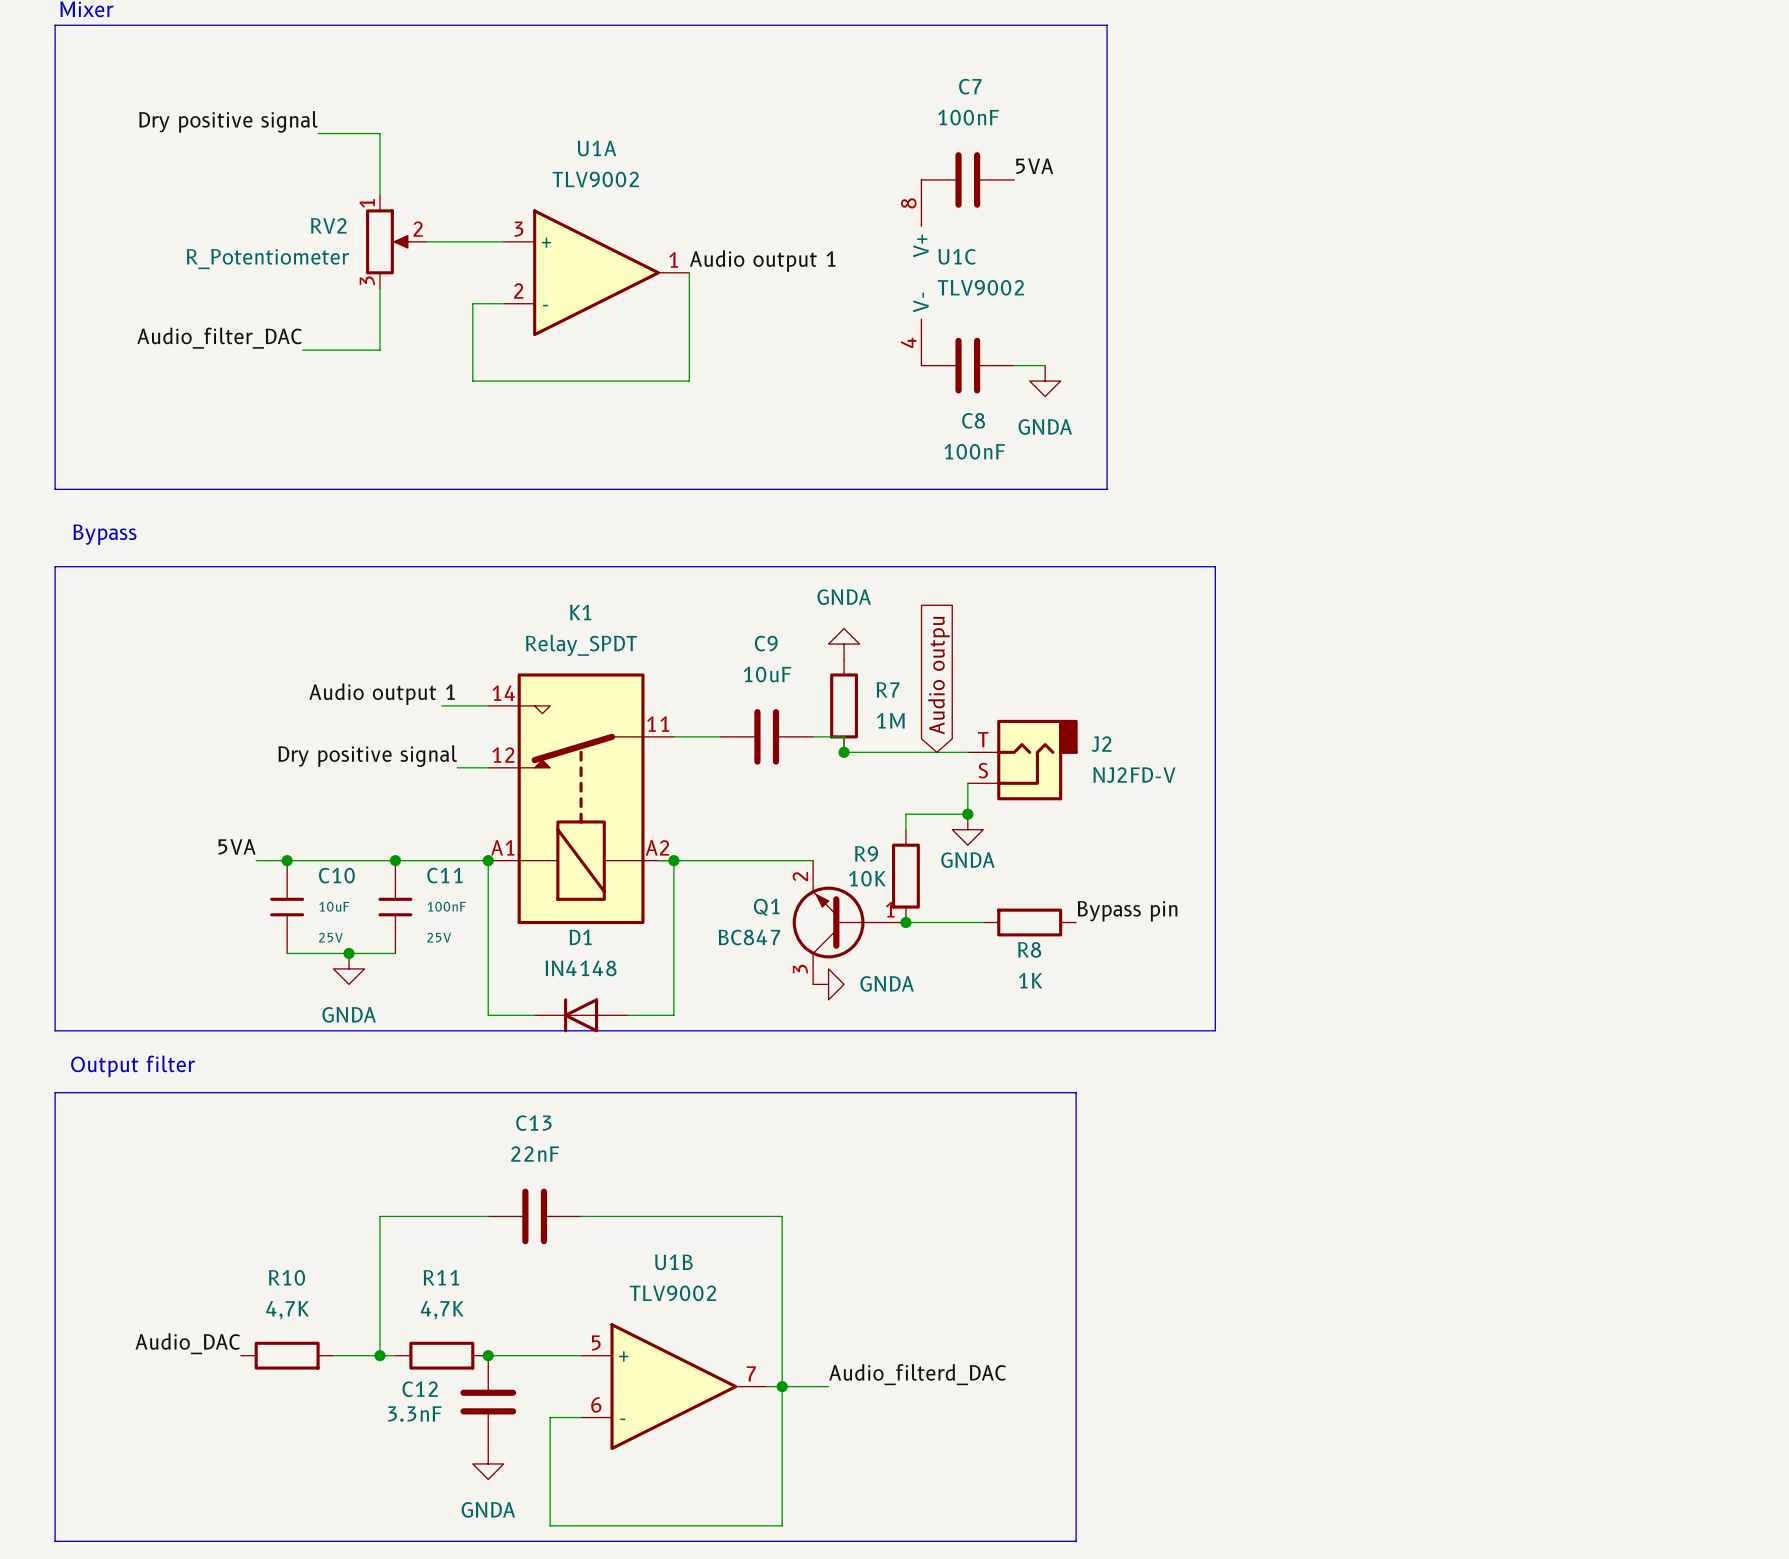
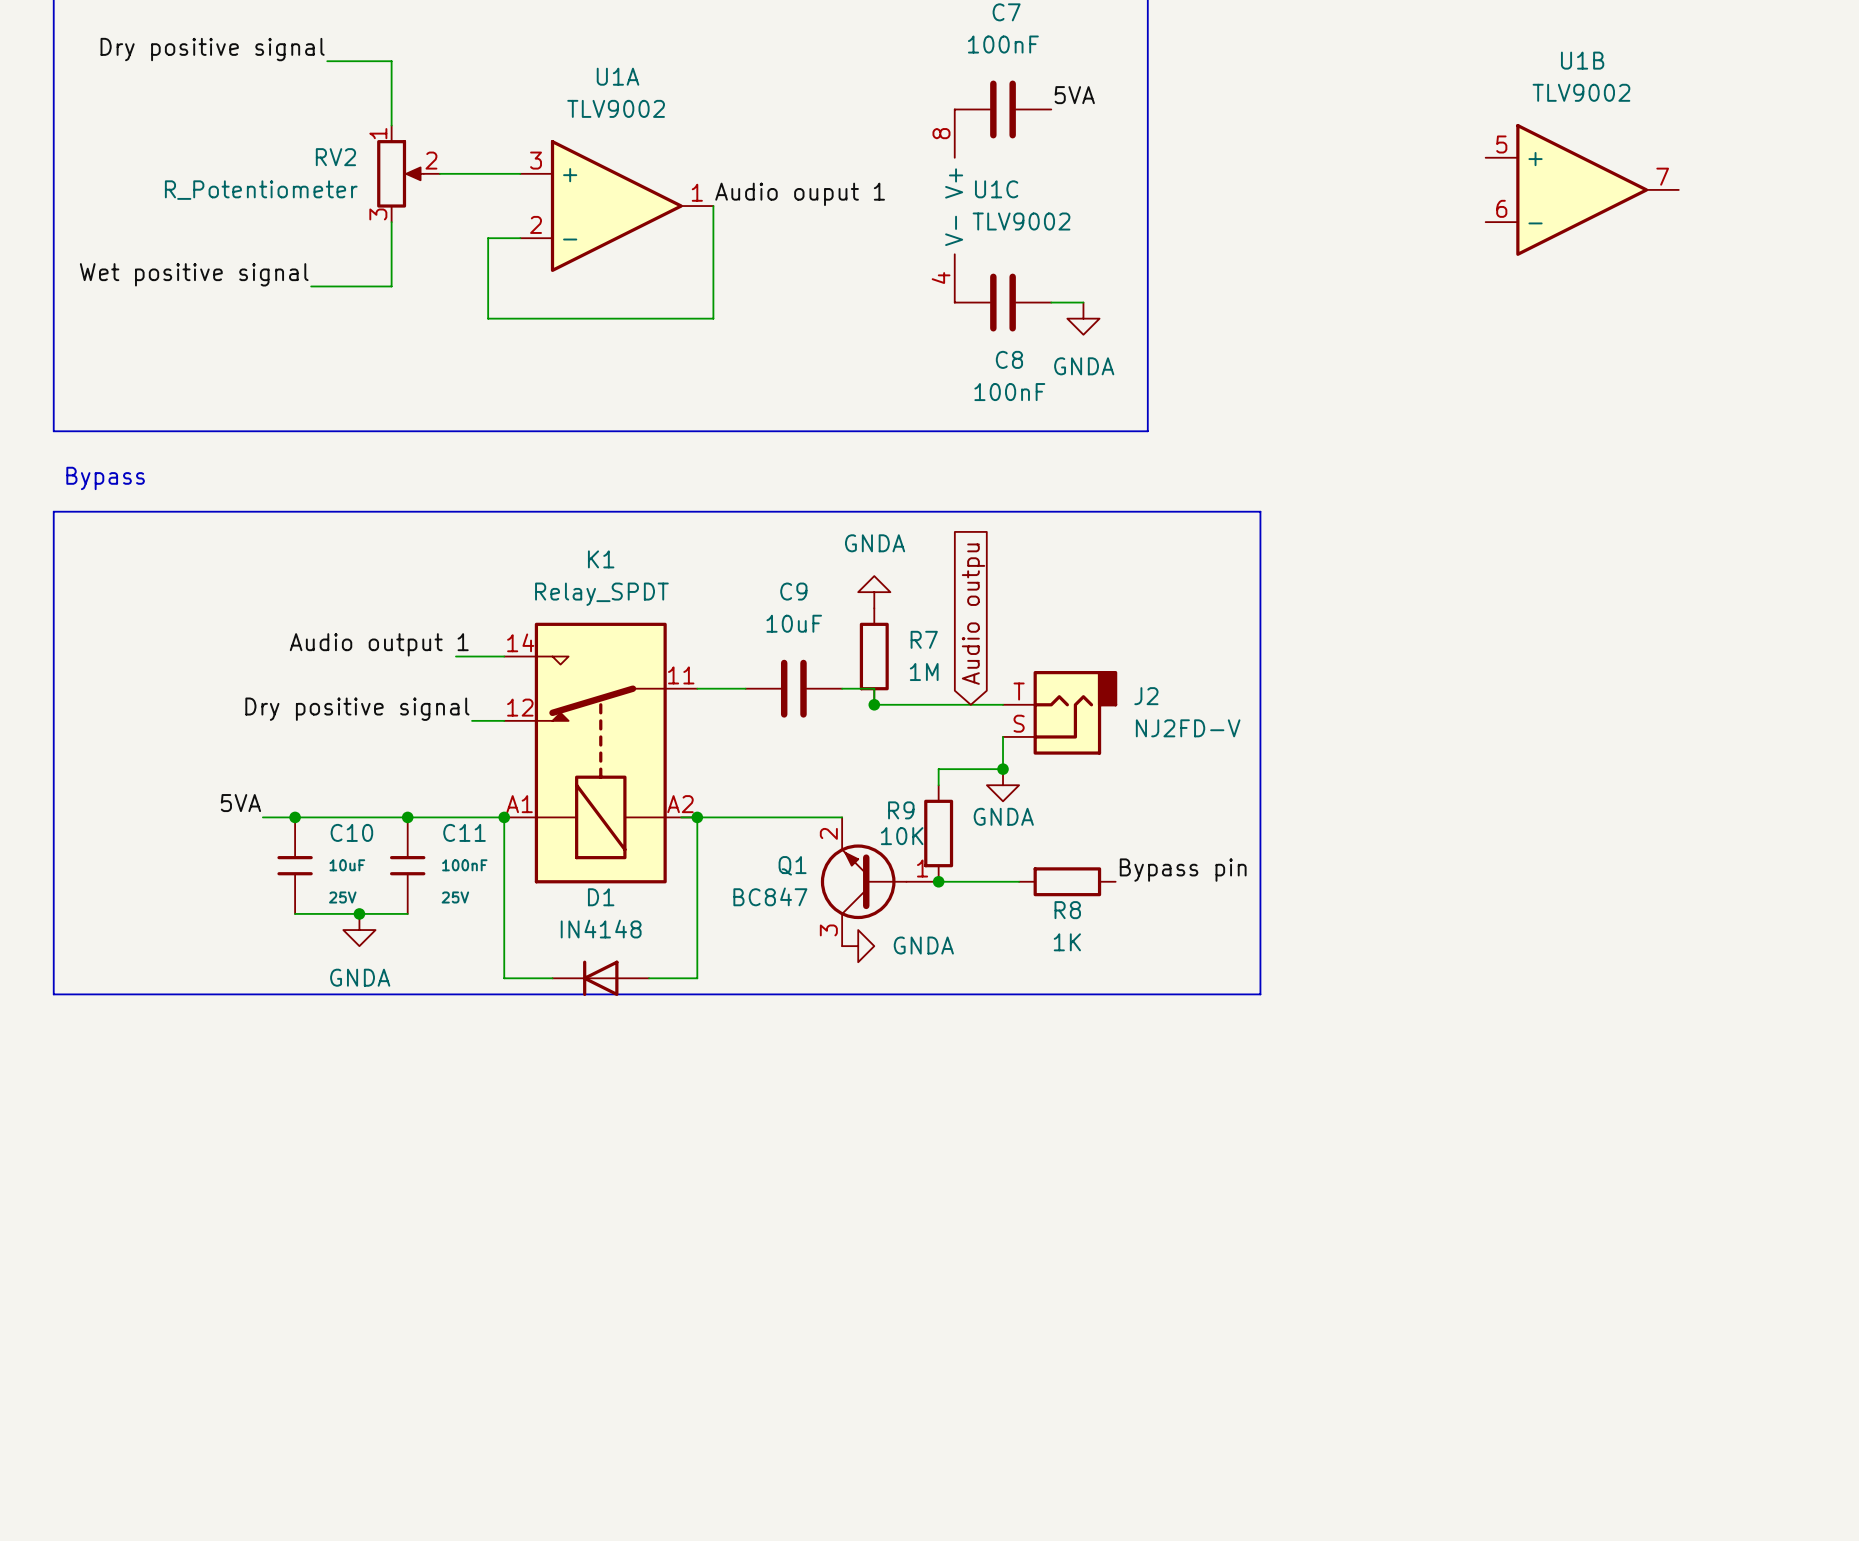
label: Audio output 1 (762, 261) -> Audio ouput 1 (800, 194)
label: Audio_filter_DAC (219, 338) -> Wet positive signal (194, 274)
text: Output filter (133, 1066) -> none
line: (55, 1092) (1076, 1092) (1076, 1541) (55, 1541) (55, 1092) -> none
wire: (488, 1216) (379, 1216) (379, 1355) -> none
C13: 22nF (534, 1216) -> none
wire: (581, 1216) (782, 1216) (782, 1525) (550, 1525) (550, 1417) (581, 1417) -> none
label: Audio_DAC (187, 1343) -> none
R10: 4,7K (287, 1355) -> none
wire: (333, 1355) (395, 1355) -> none
junction: (379, 1355) -> none
R11: 4,7K (441, 1355) -> none
wire: (488, 1355) (581, 1355) -> none
junction: (488, 1355) -> none
label: Audio_filterd_DAC (917, 1374) -> none
U1B position: (673, 1386) -> (1582, 189)
wire: (766, 1386) (828, 1386) -> none
junction: (782, 1386) -> none
C12: 3.3nF (488, 1402) -> none
power symbol: GNDA (488, 1463) -> none

